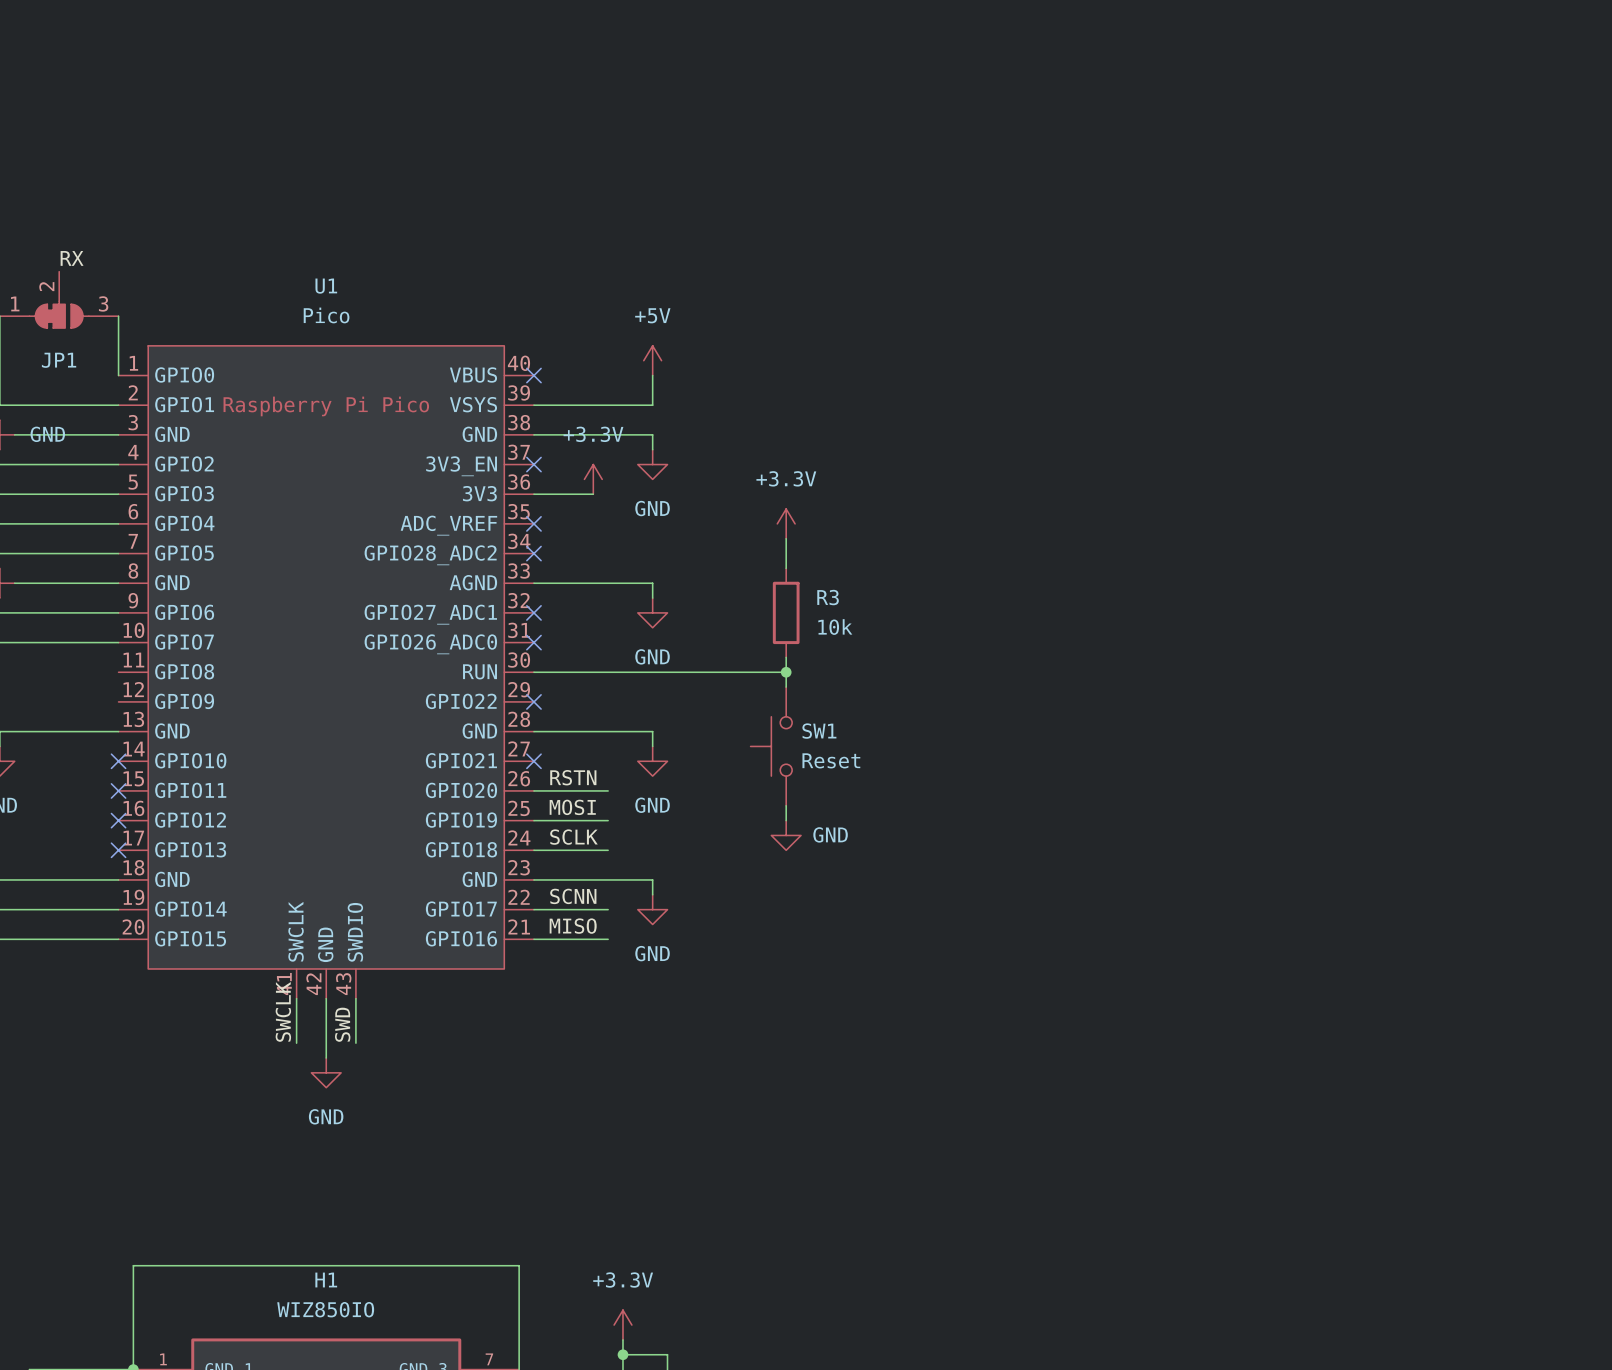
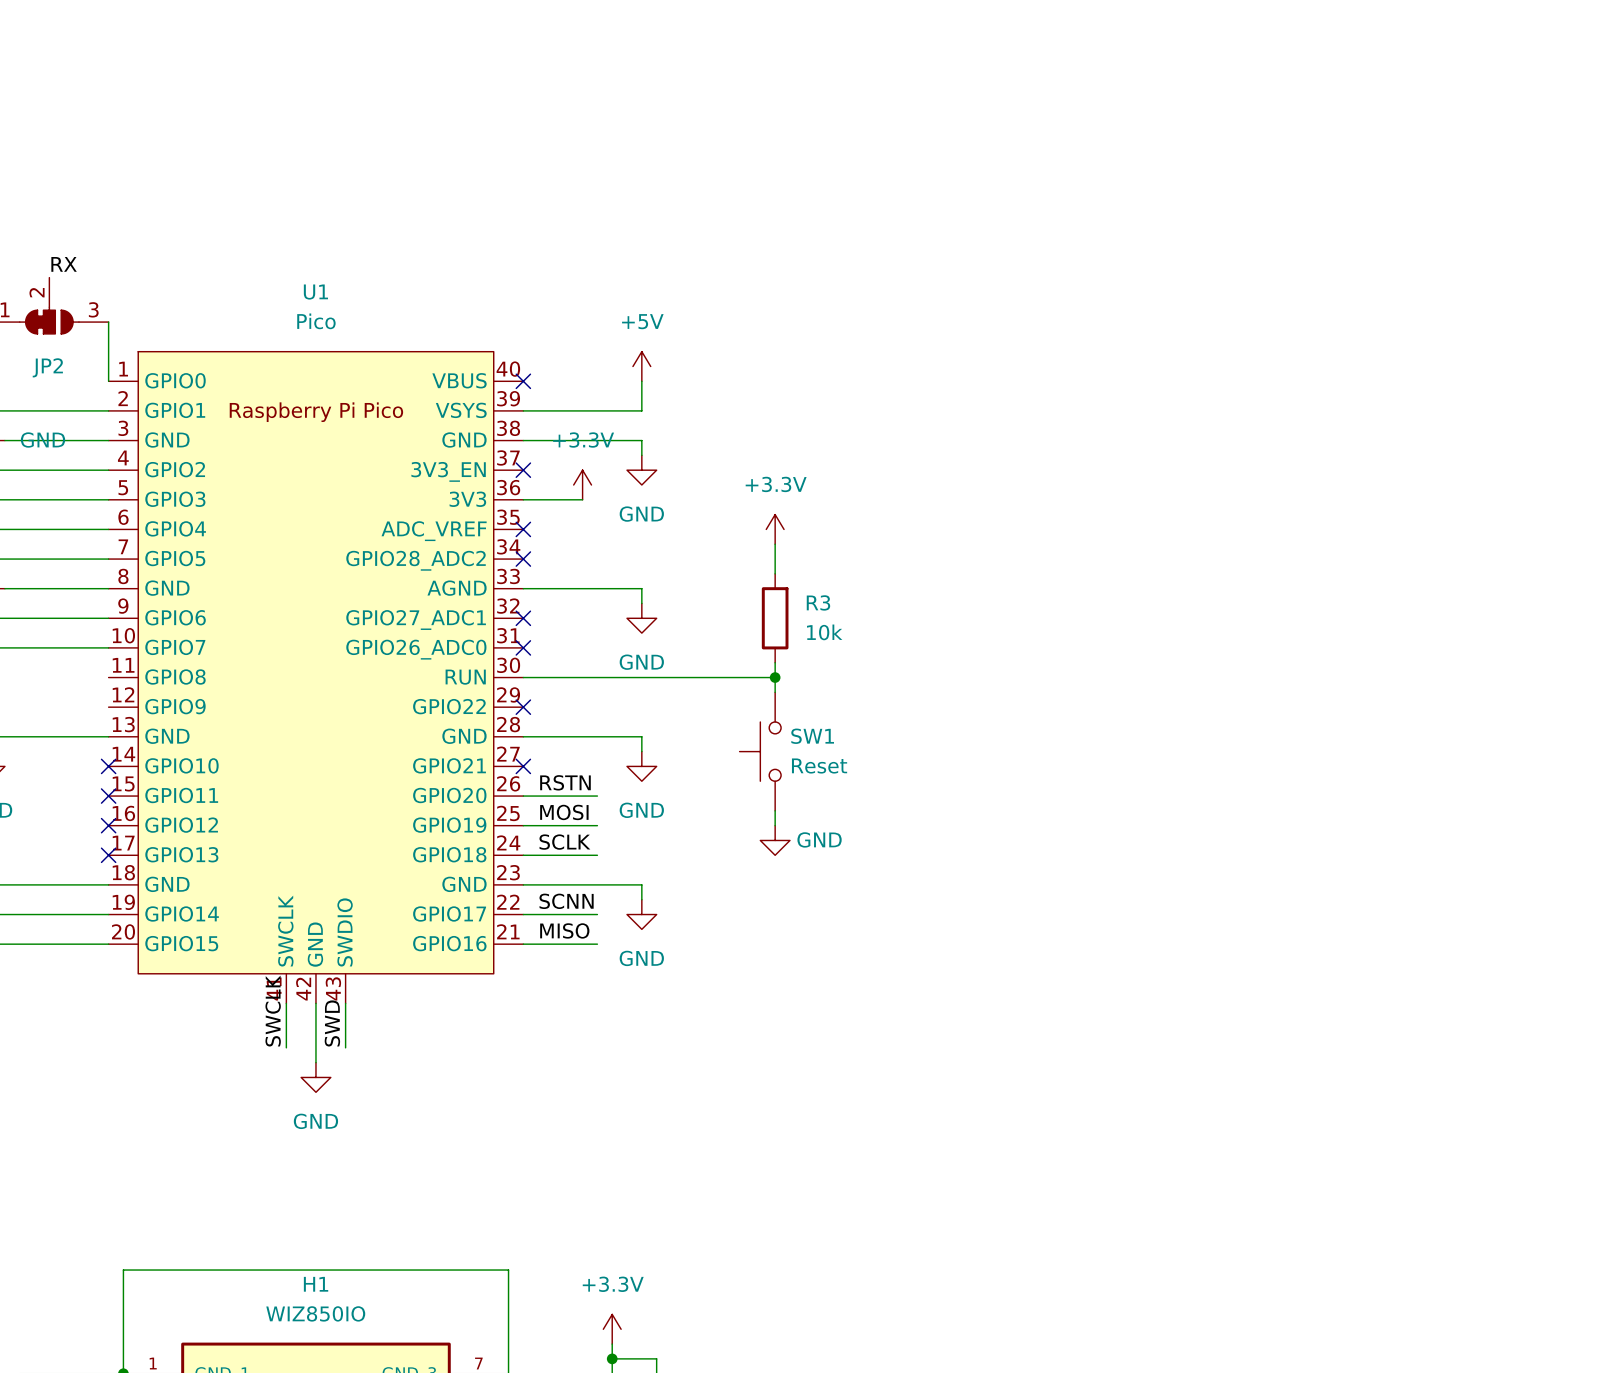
JP1 name: JP1 (59, 360) -> JP2 (47, 367)

